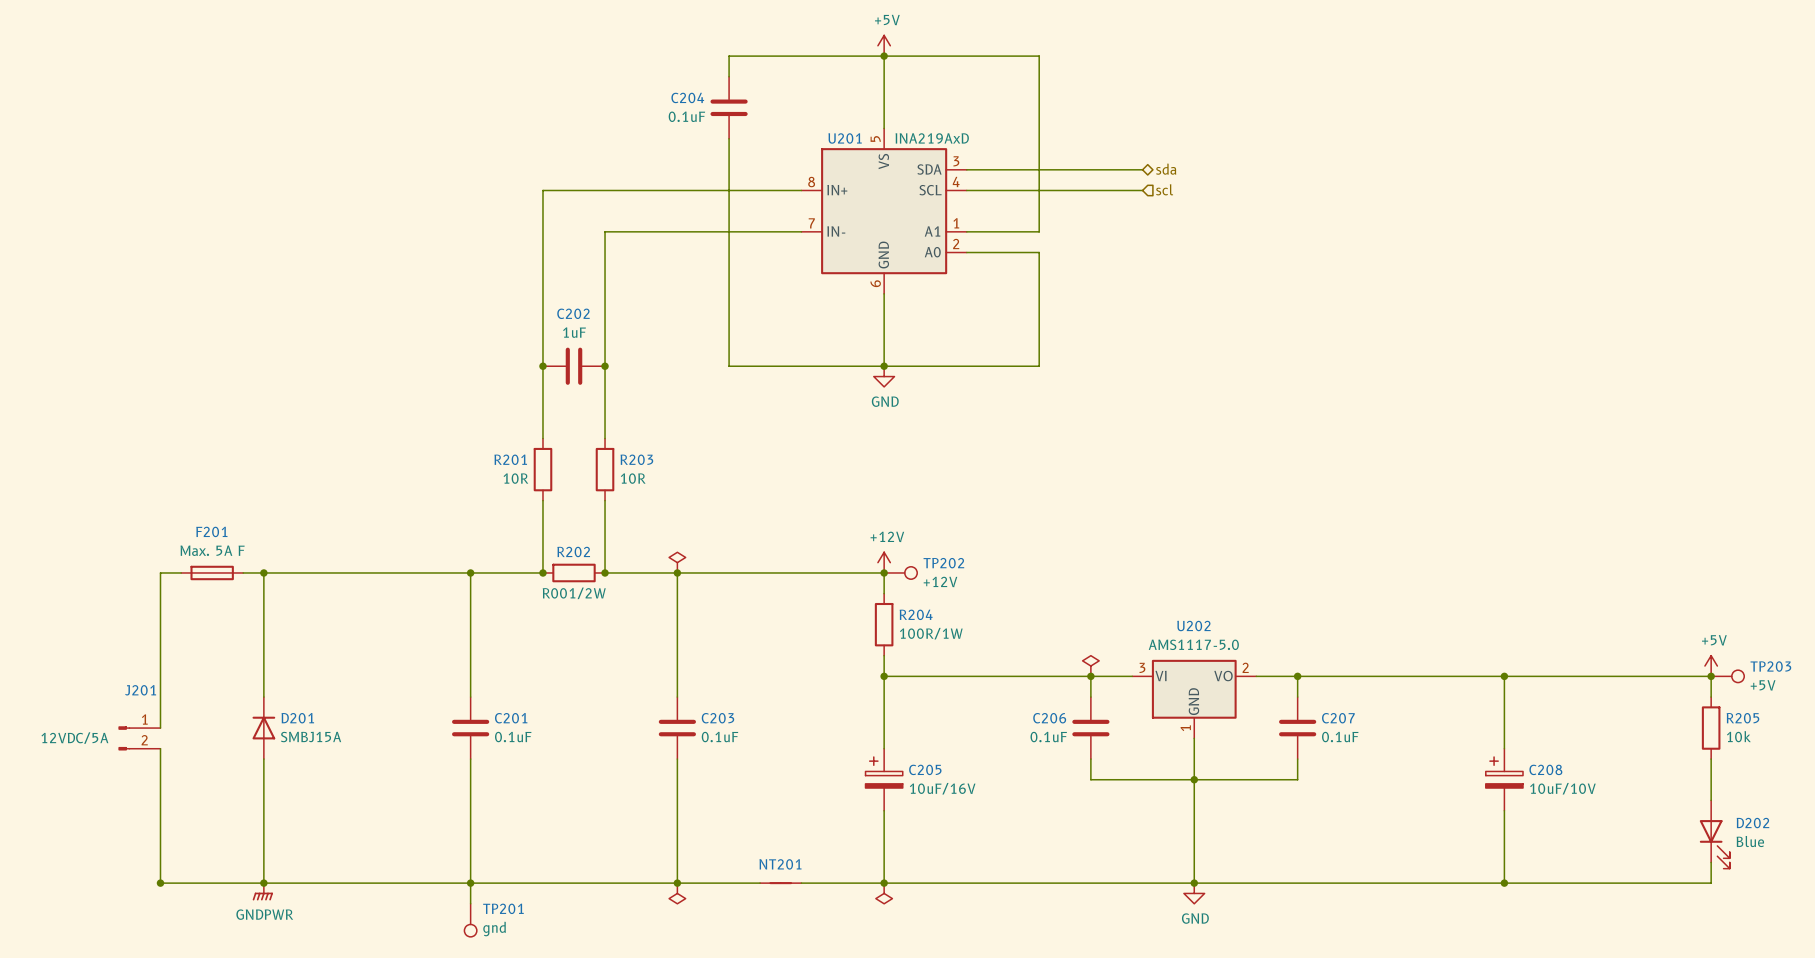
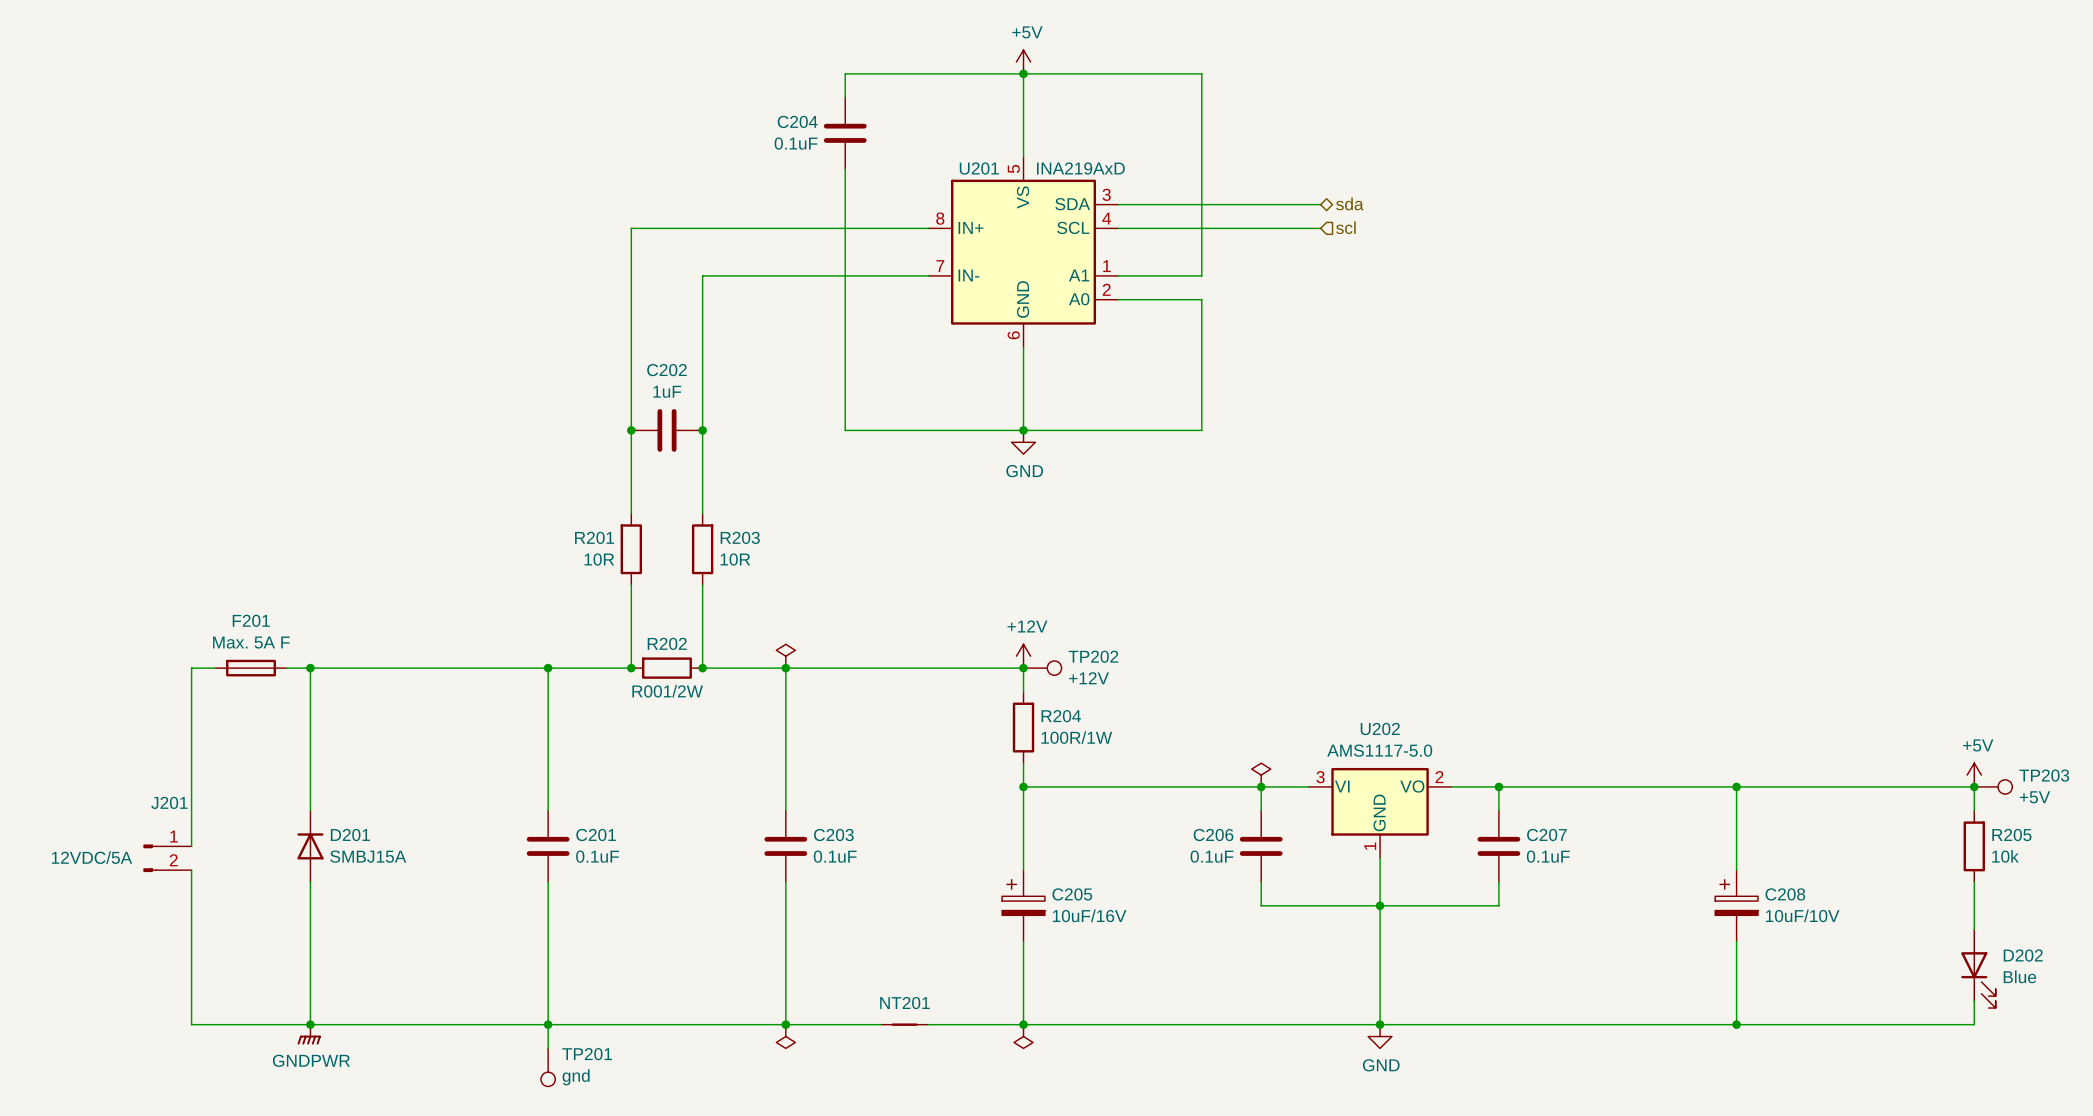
junction: (160, 883) -> none

